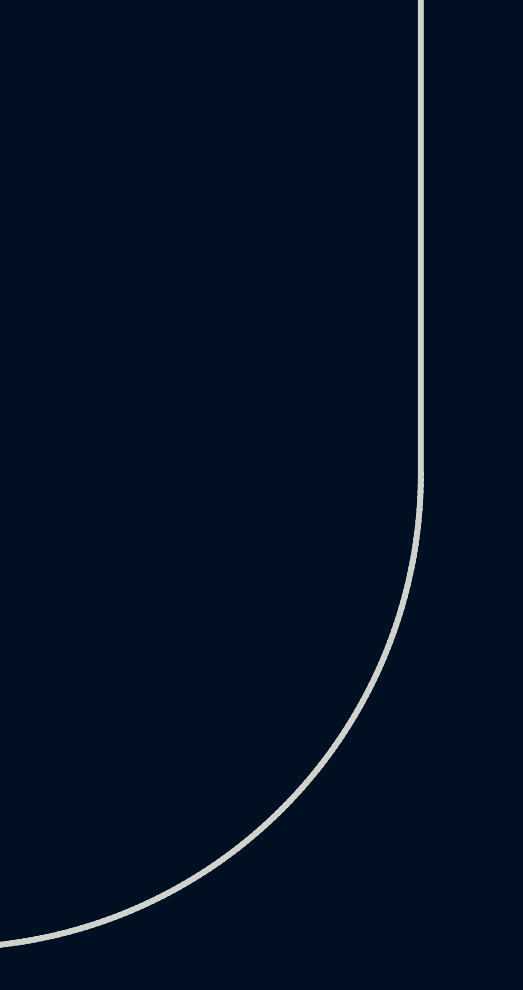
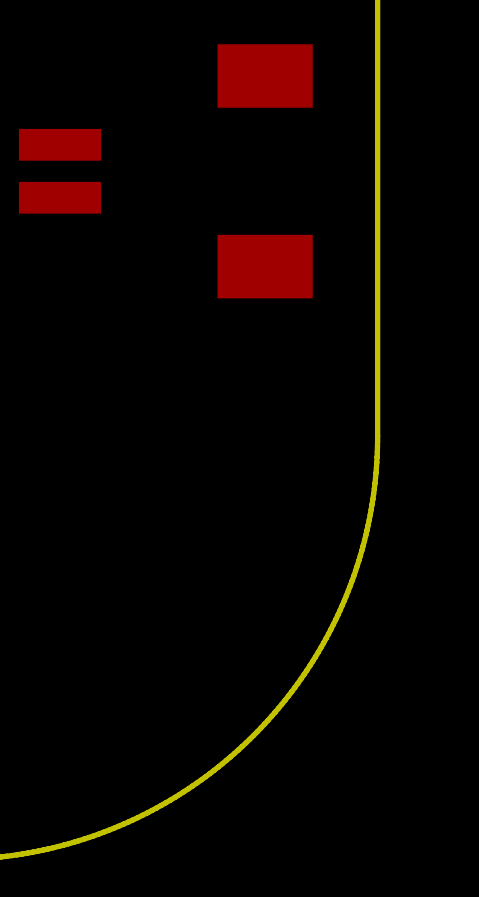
part: none -> (165, 171)

